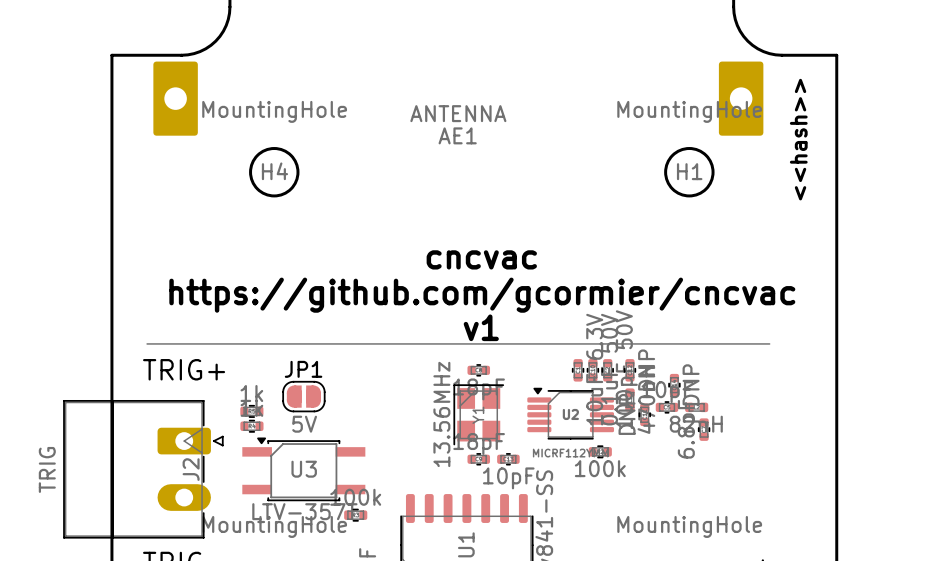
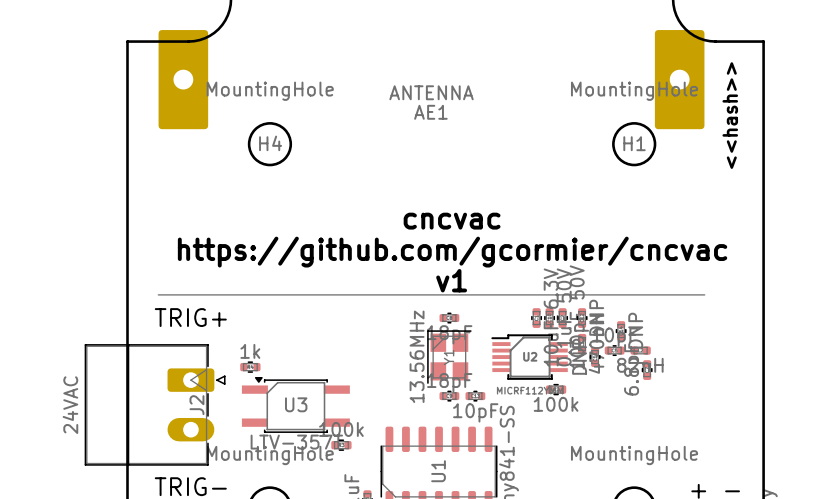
AE1 footprint: [146, 61, 771, 345] -> [157, 30, 706, 296]
U2 footprint: [527, 387, 615, 440] -> [491, 334, 568, 380]
JP1: 5V (303, 396) -> none
part: 1k (251, 411) -> none
J2 value: TRIG (47, 469) -> 24VAC (70, 405)

